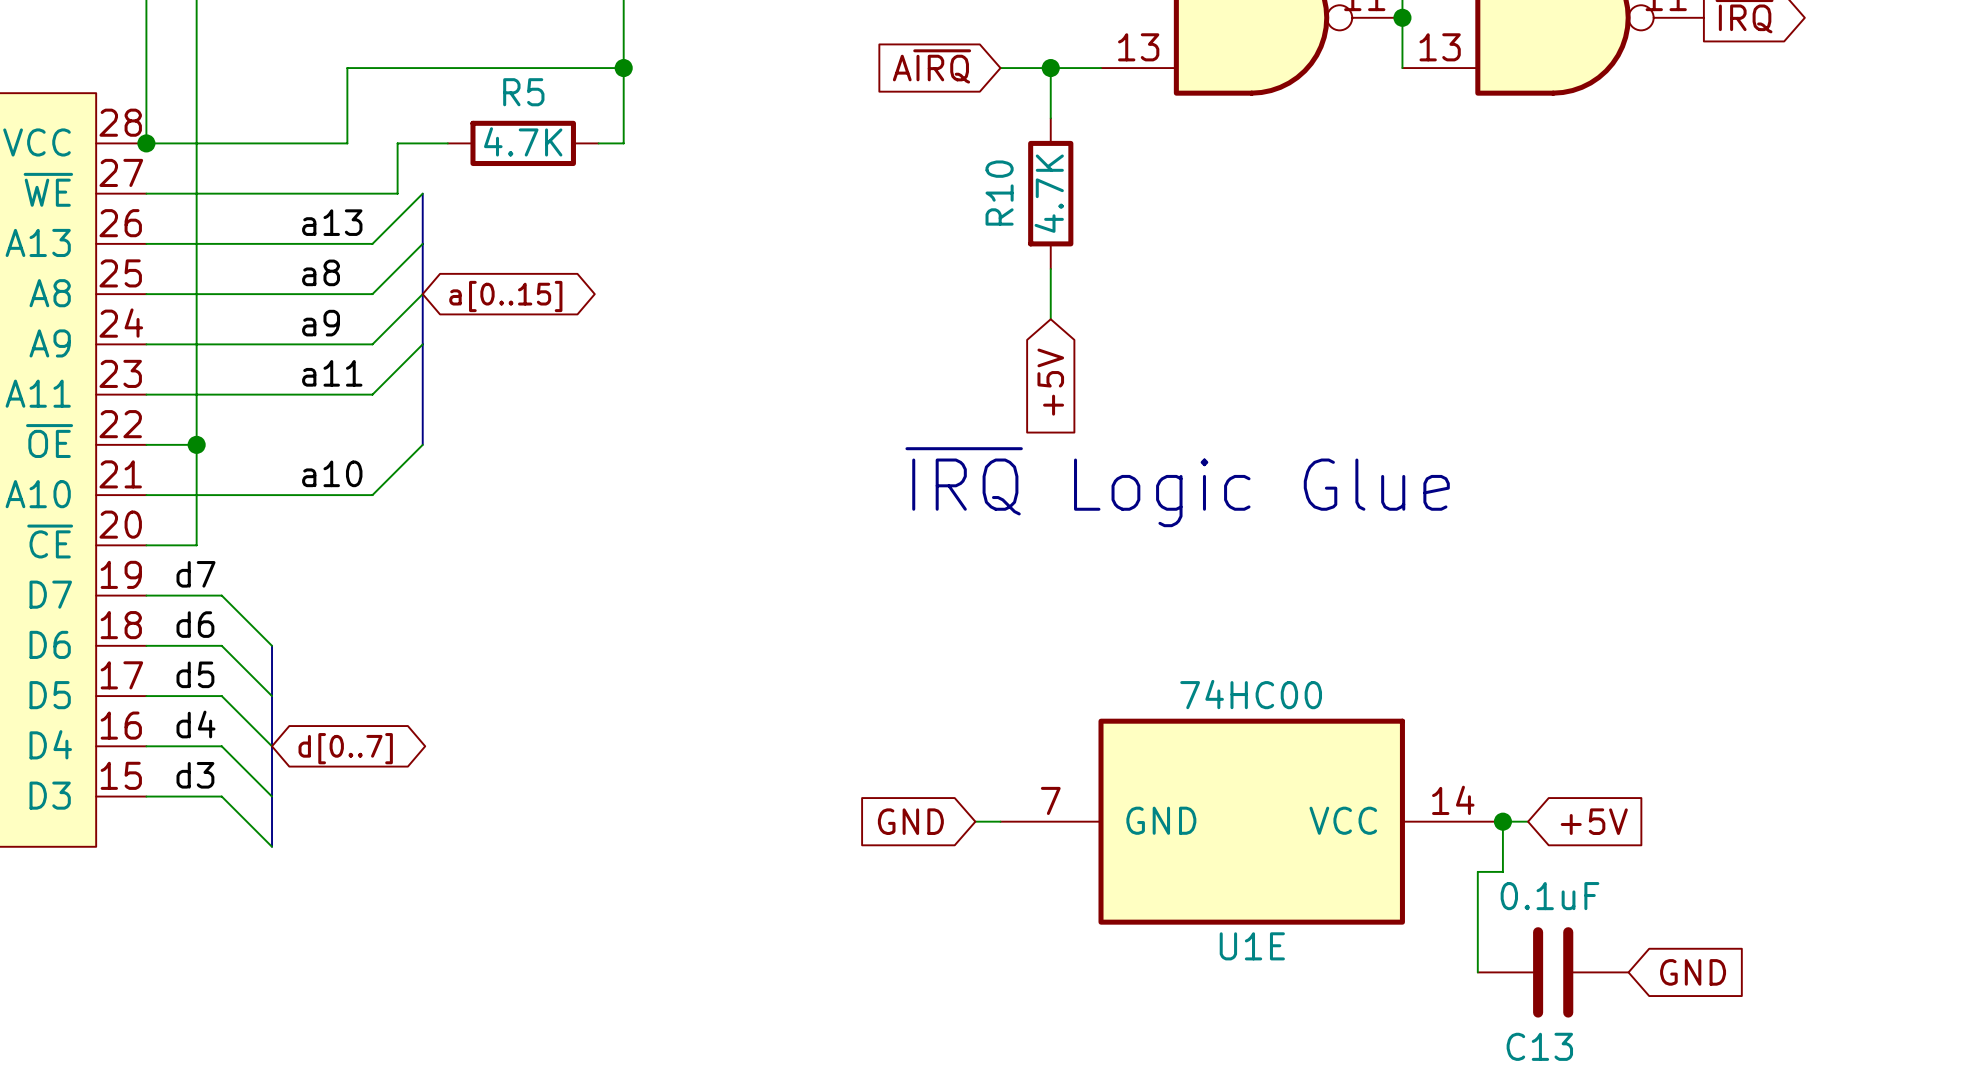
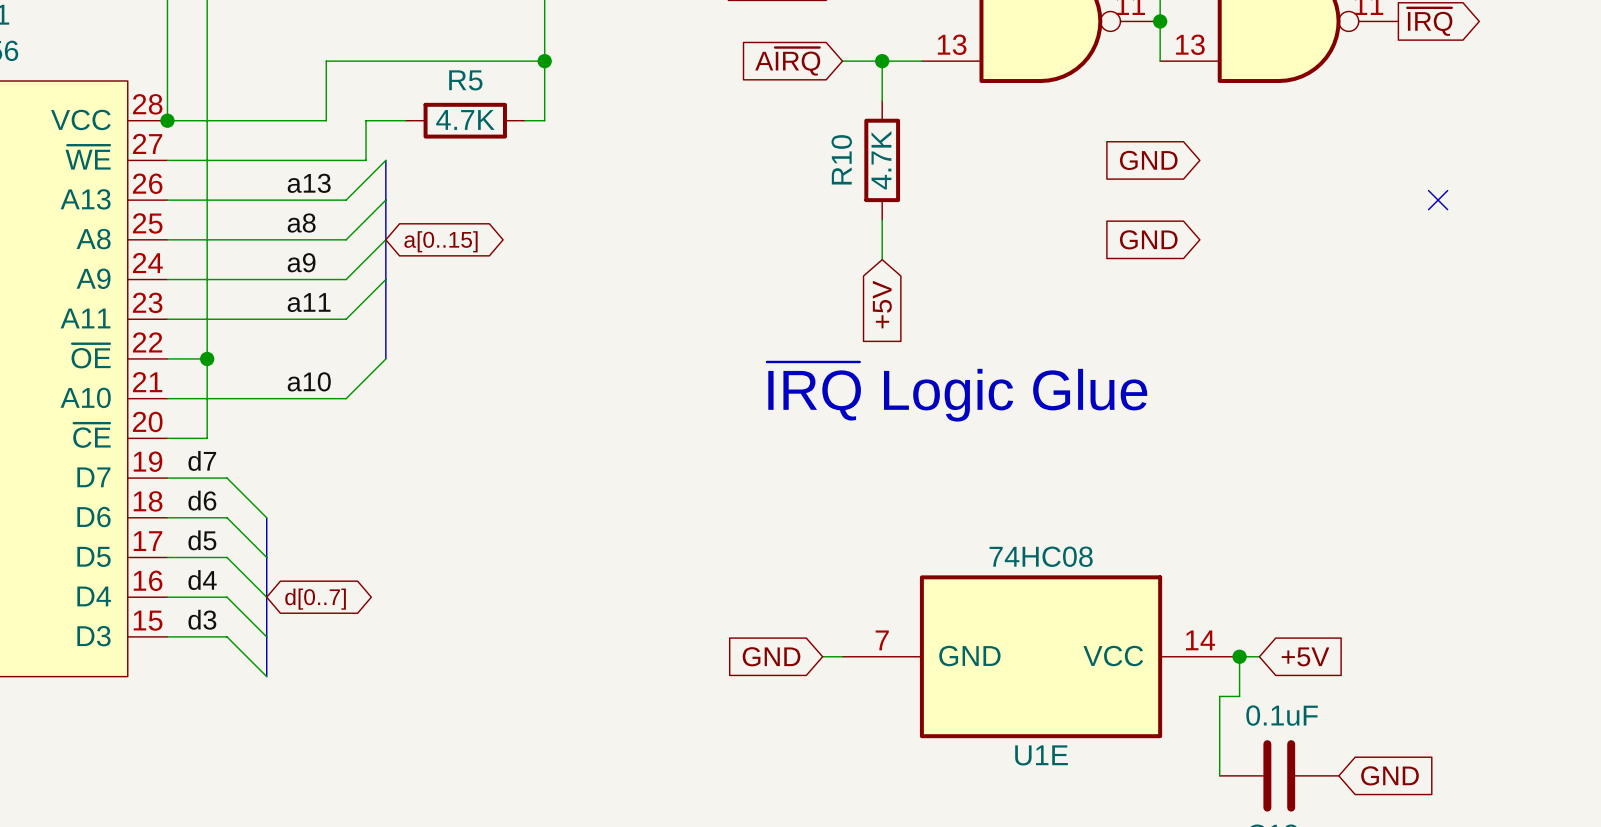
global label: none -> GND (1148, 160)
no-connect mark: none -> (1438, 200)
global label: none -> GND (1148, 239)
U1E value: 74HC00 (1251, 694) -> 74HC08 (1041, 556)

